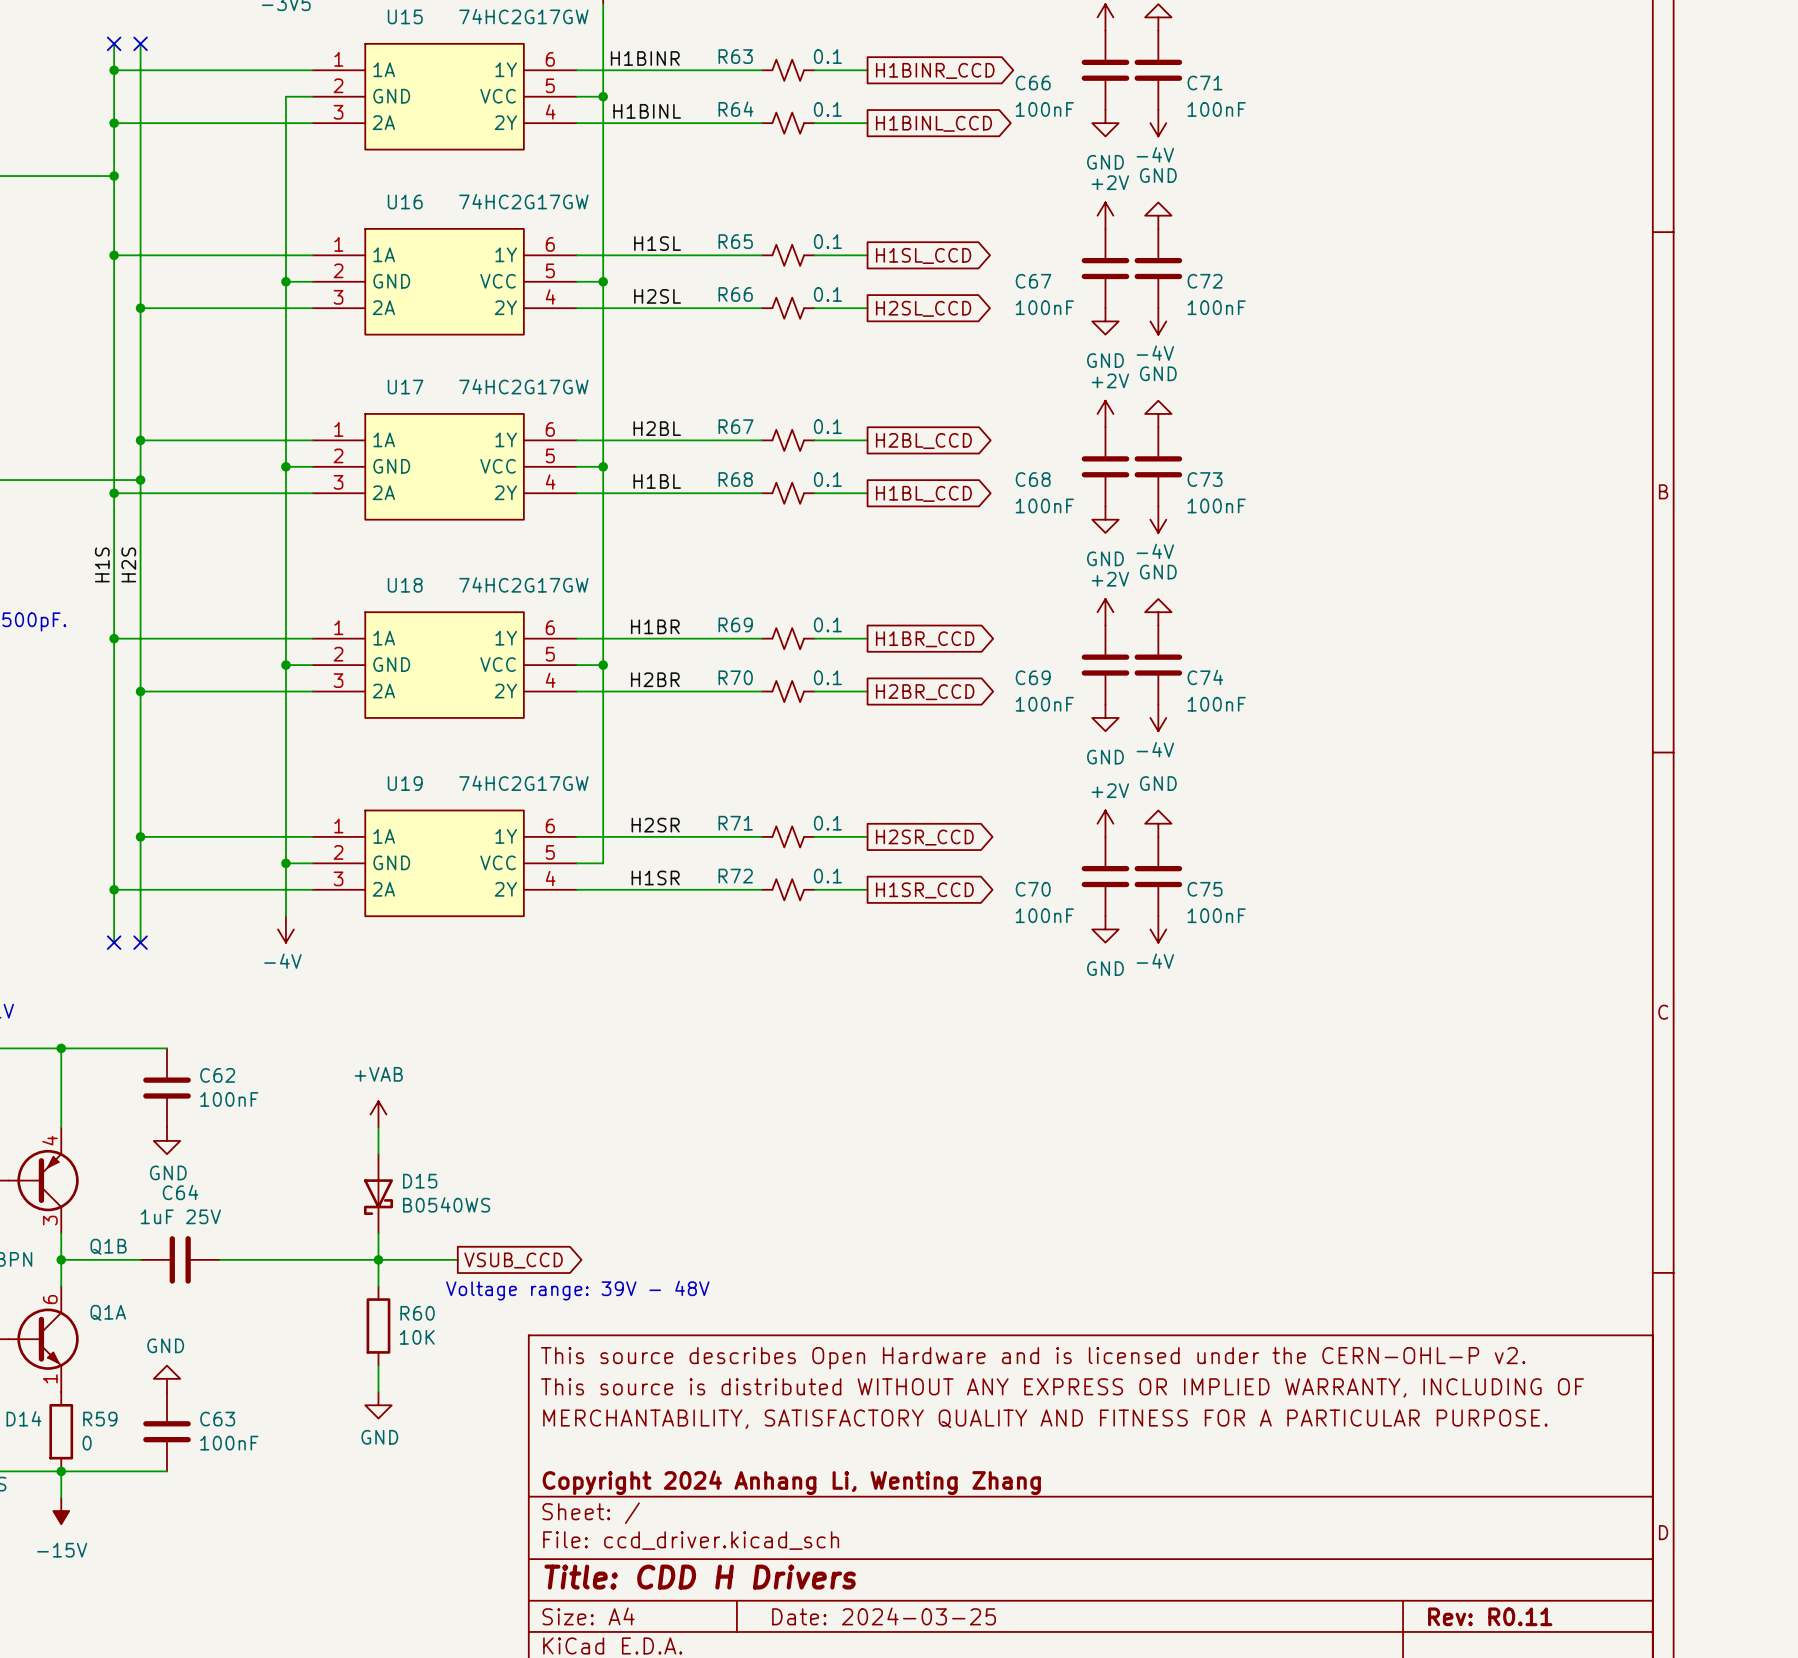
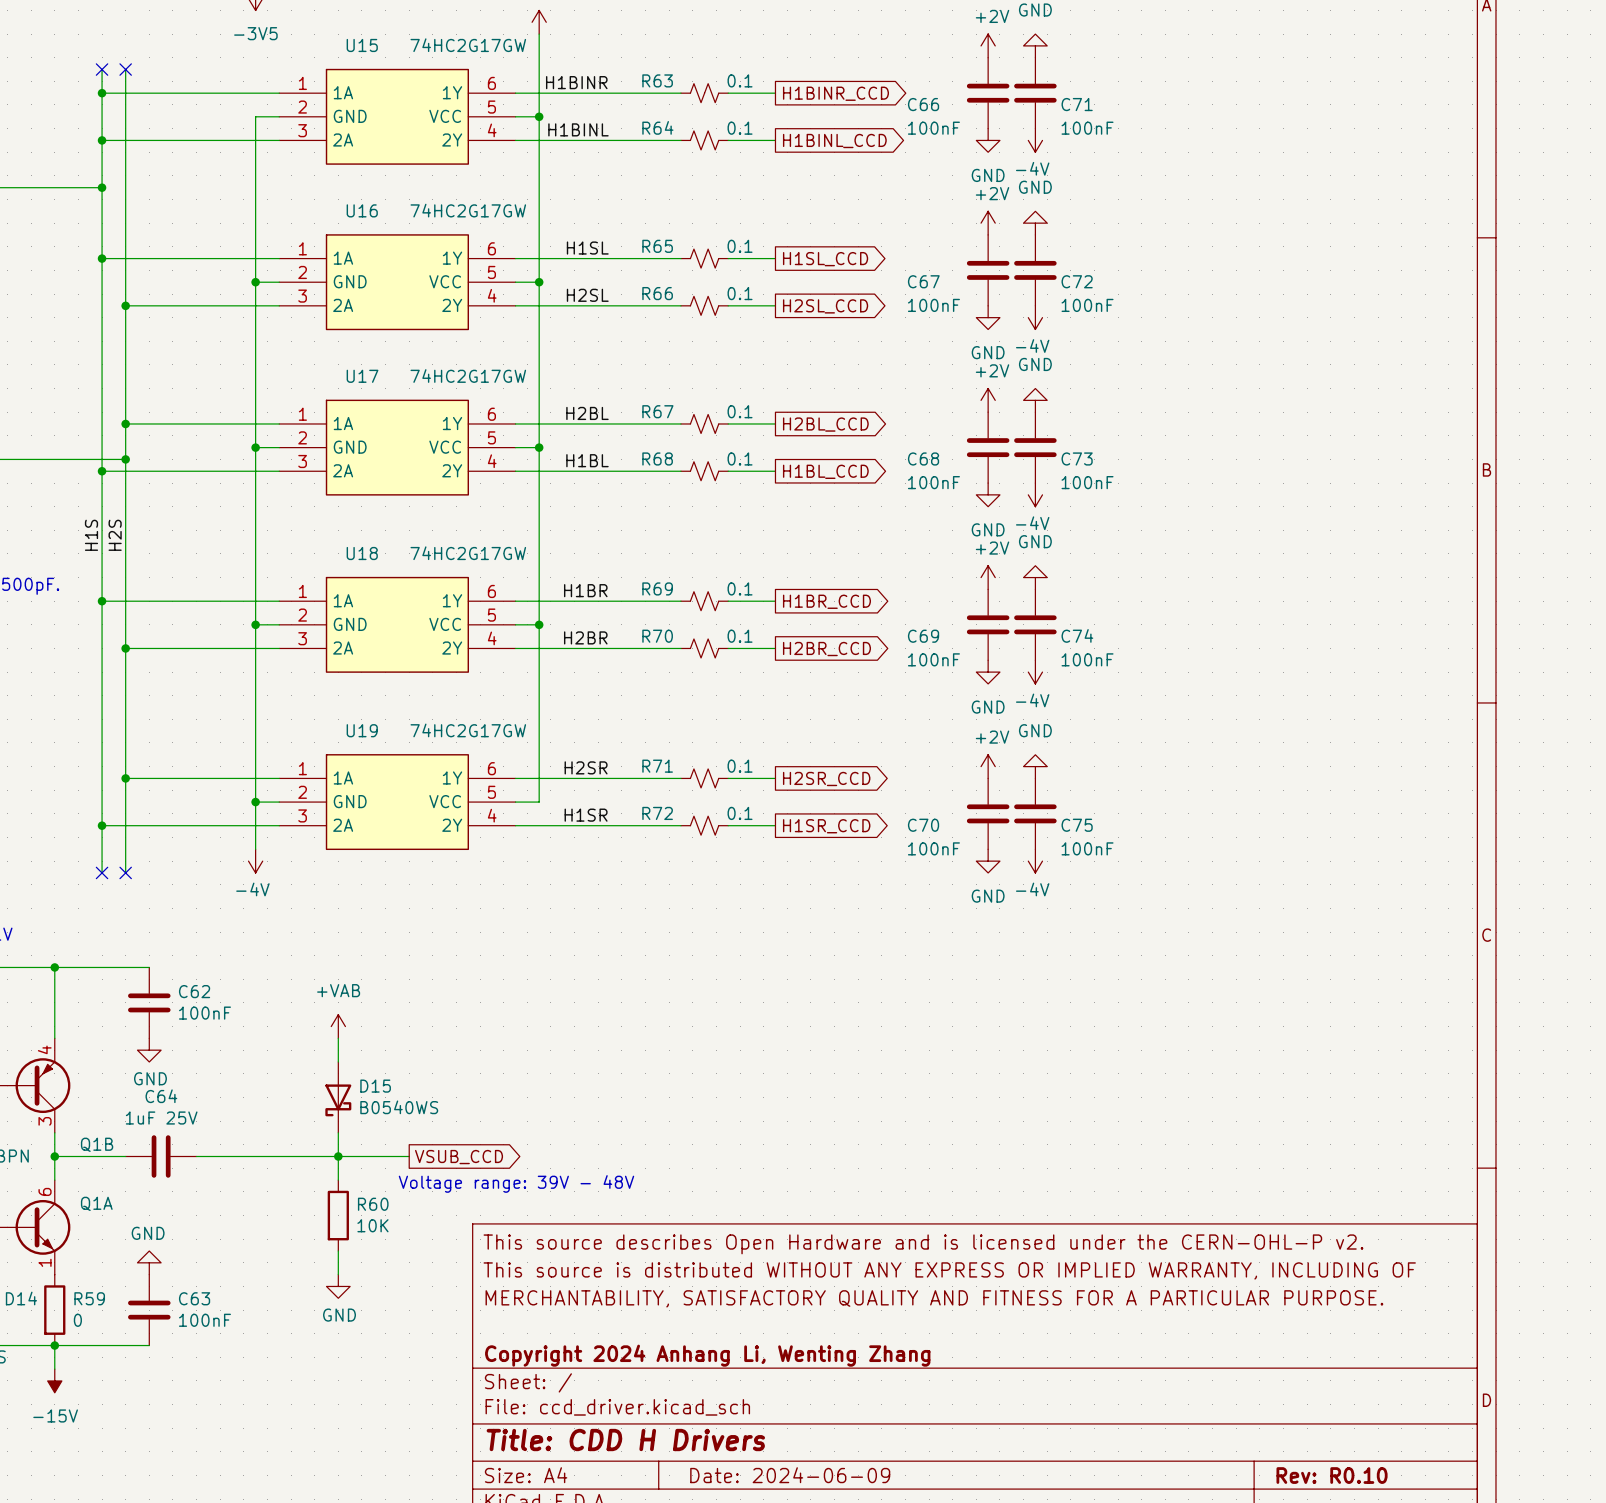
title block: Date: 2024-03-25 (884, 1616) -> Date: 2024-06-09 (790, 1475)
title block: Rev: R0.11 (1490, 1616) -> Rev: R0.10 (1332, 1475)

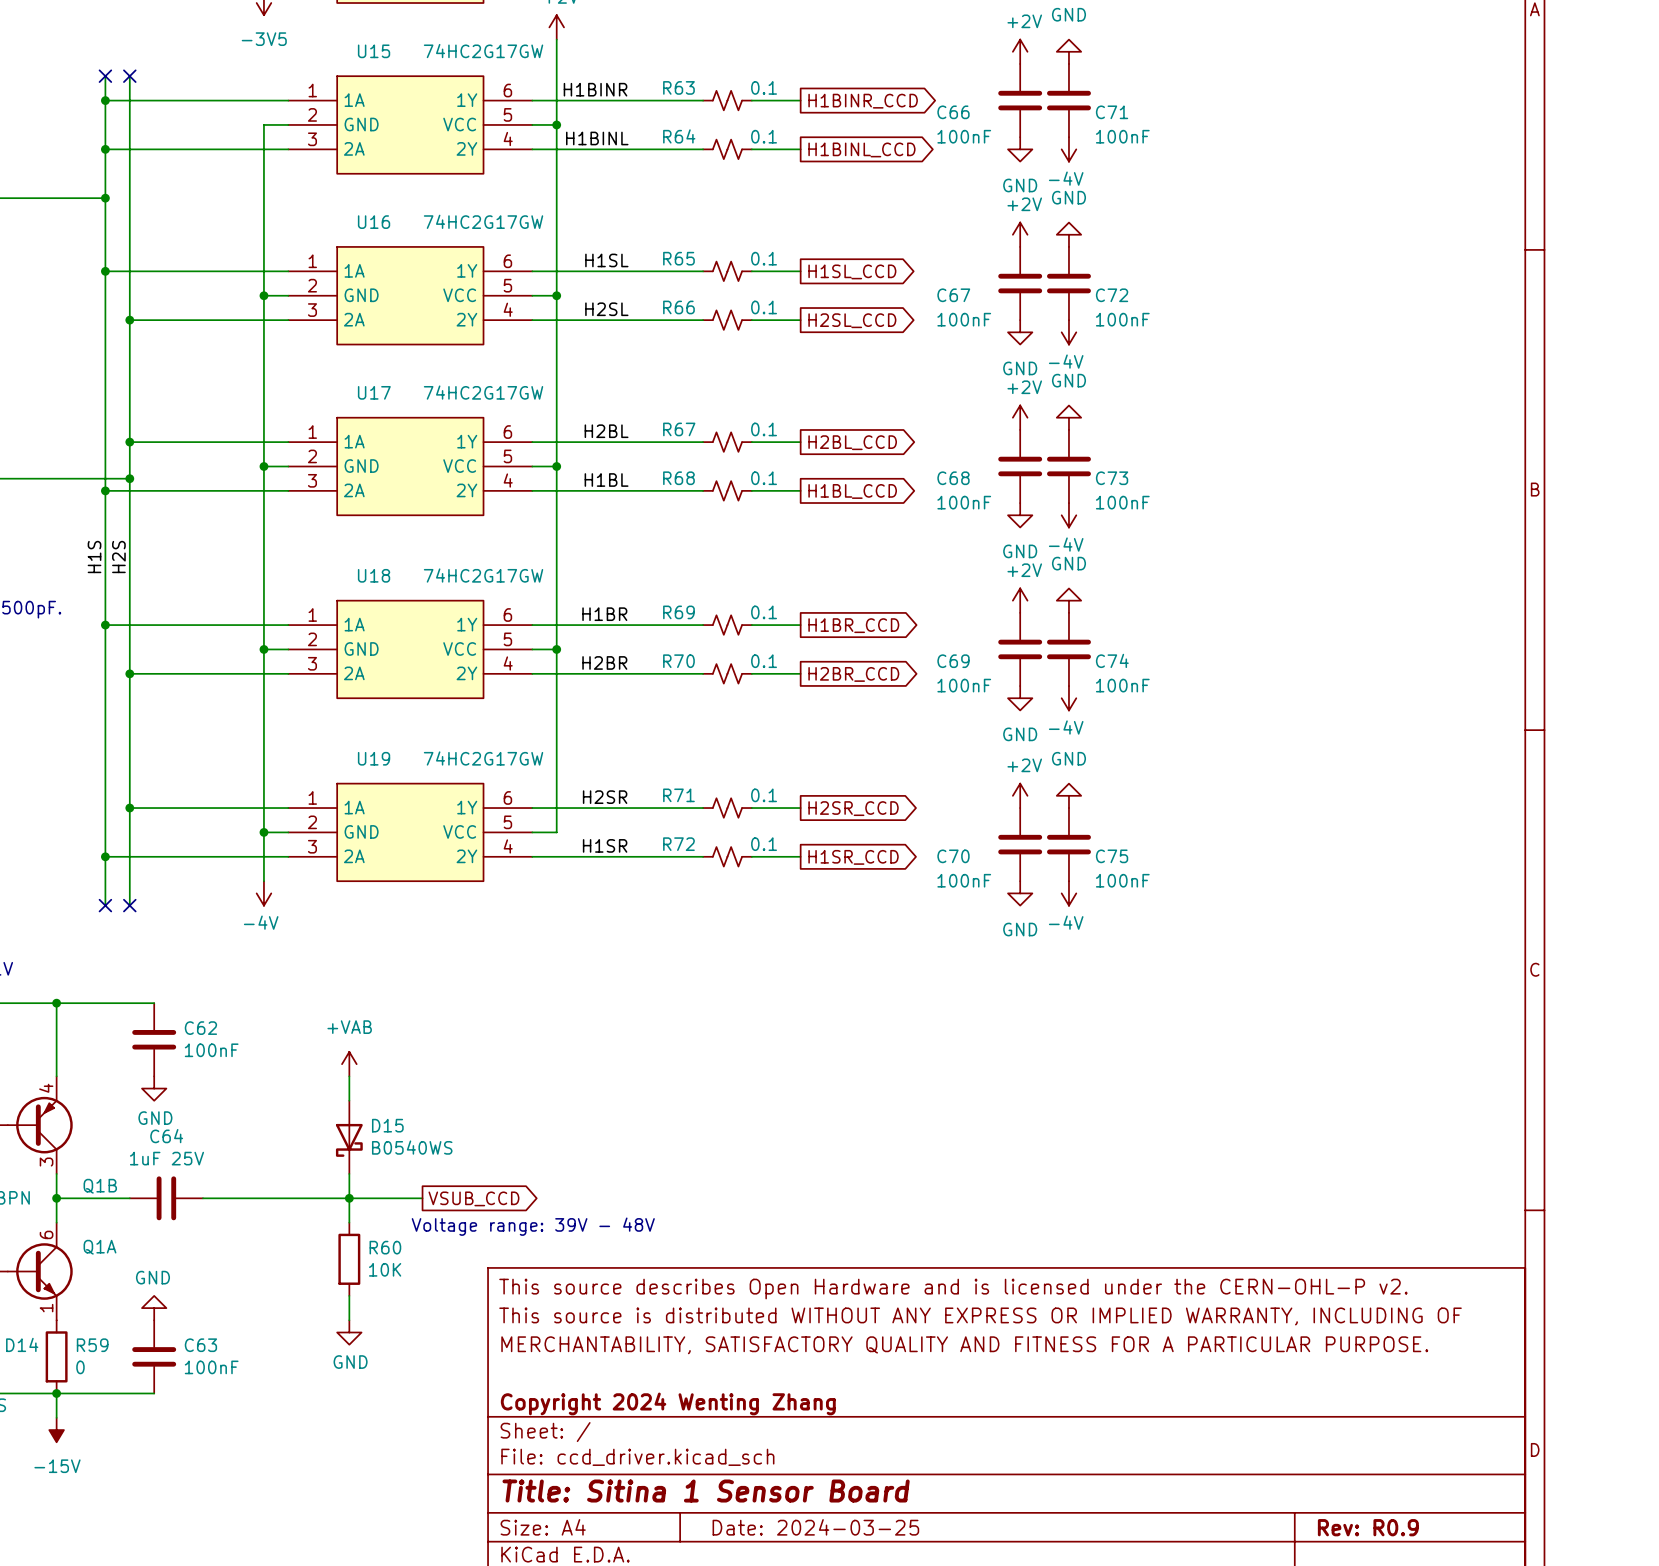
title block: Copyright 2024 Anhang Li, Wenting Zhang (707, 1355) -> Copyright 2024 Wenting Zhang (668, 1403)
title block: Title: CDD H Drivers (625, 1440) -> Title: Sitina 1 Sensor Board (706, 1491)
title block: Date: 2024-06-09 (790, 1475) -> Date: 2024-03-25 (815, 1527)
title block: Rev: R0.10 (1332, 1475) -> Rev: R0.9 (1368, 1527)

